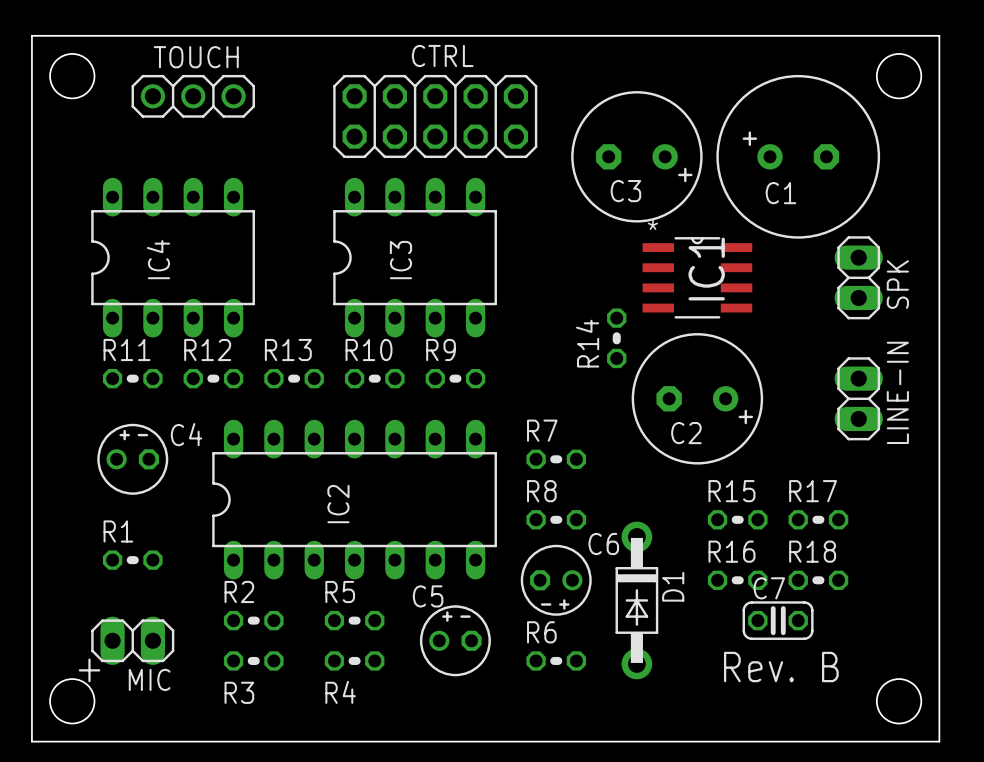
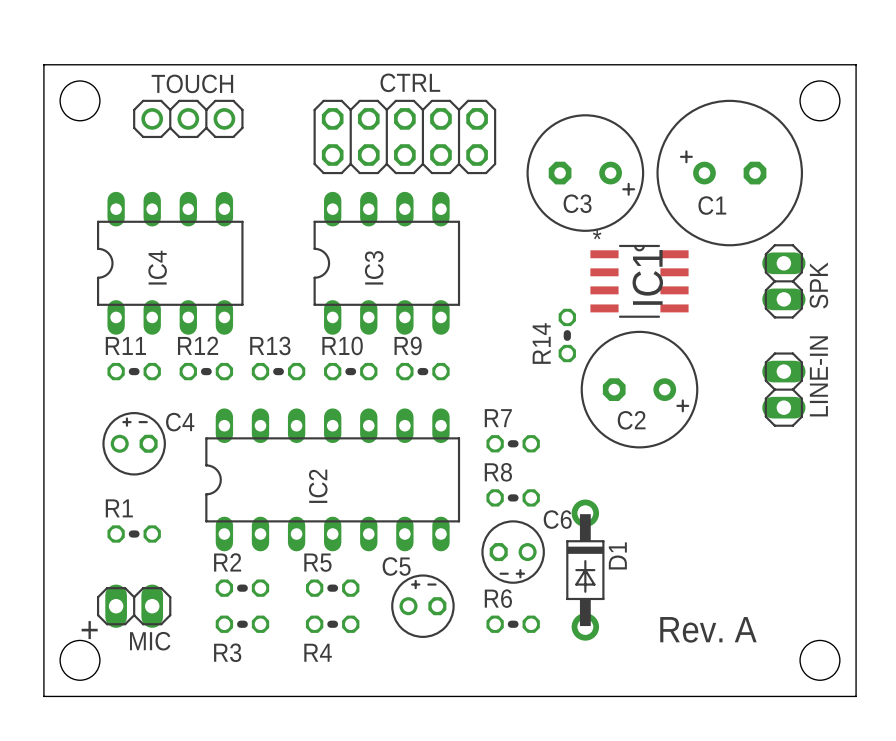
R15: (737, 519) -> none
R17: (818, 519) -> none
R16: (737, 580) -> none
R18: (818, 580) -> none
C7: (778, 620) -> none
text: Rev. B (781, 667) -> Rev. A (708, 629)

